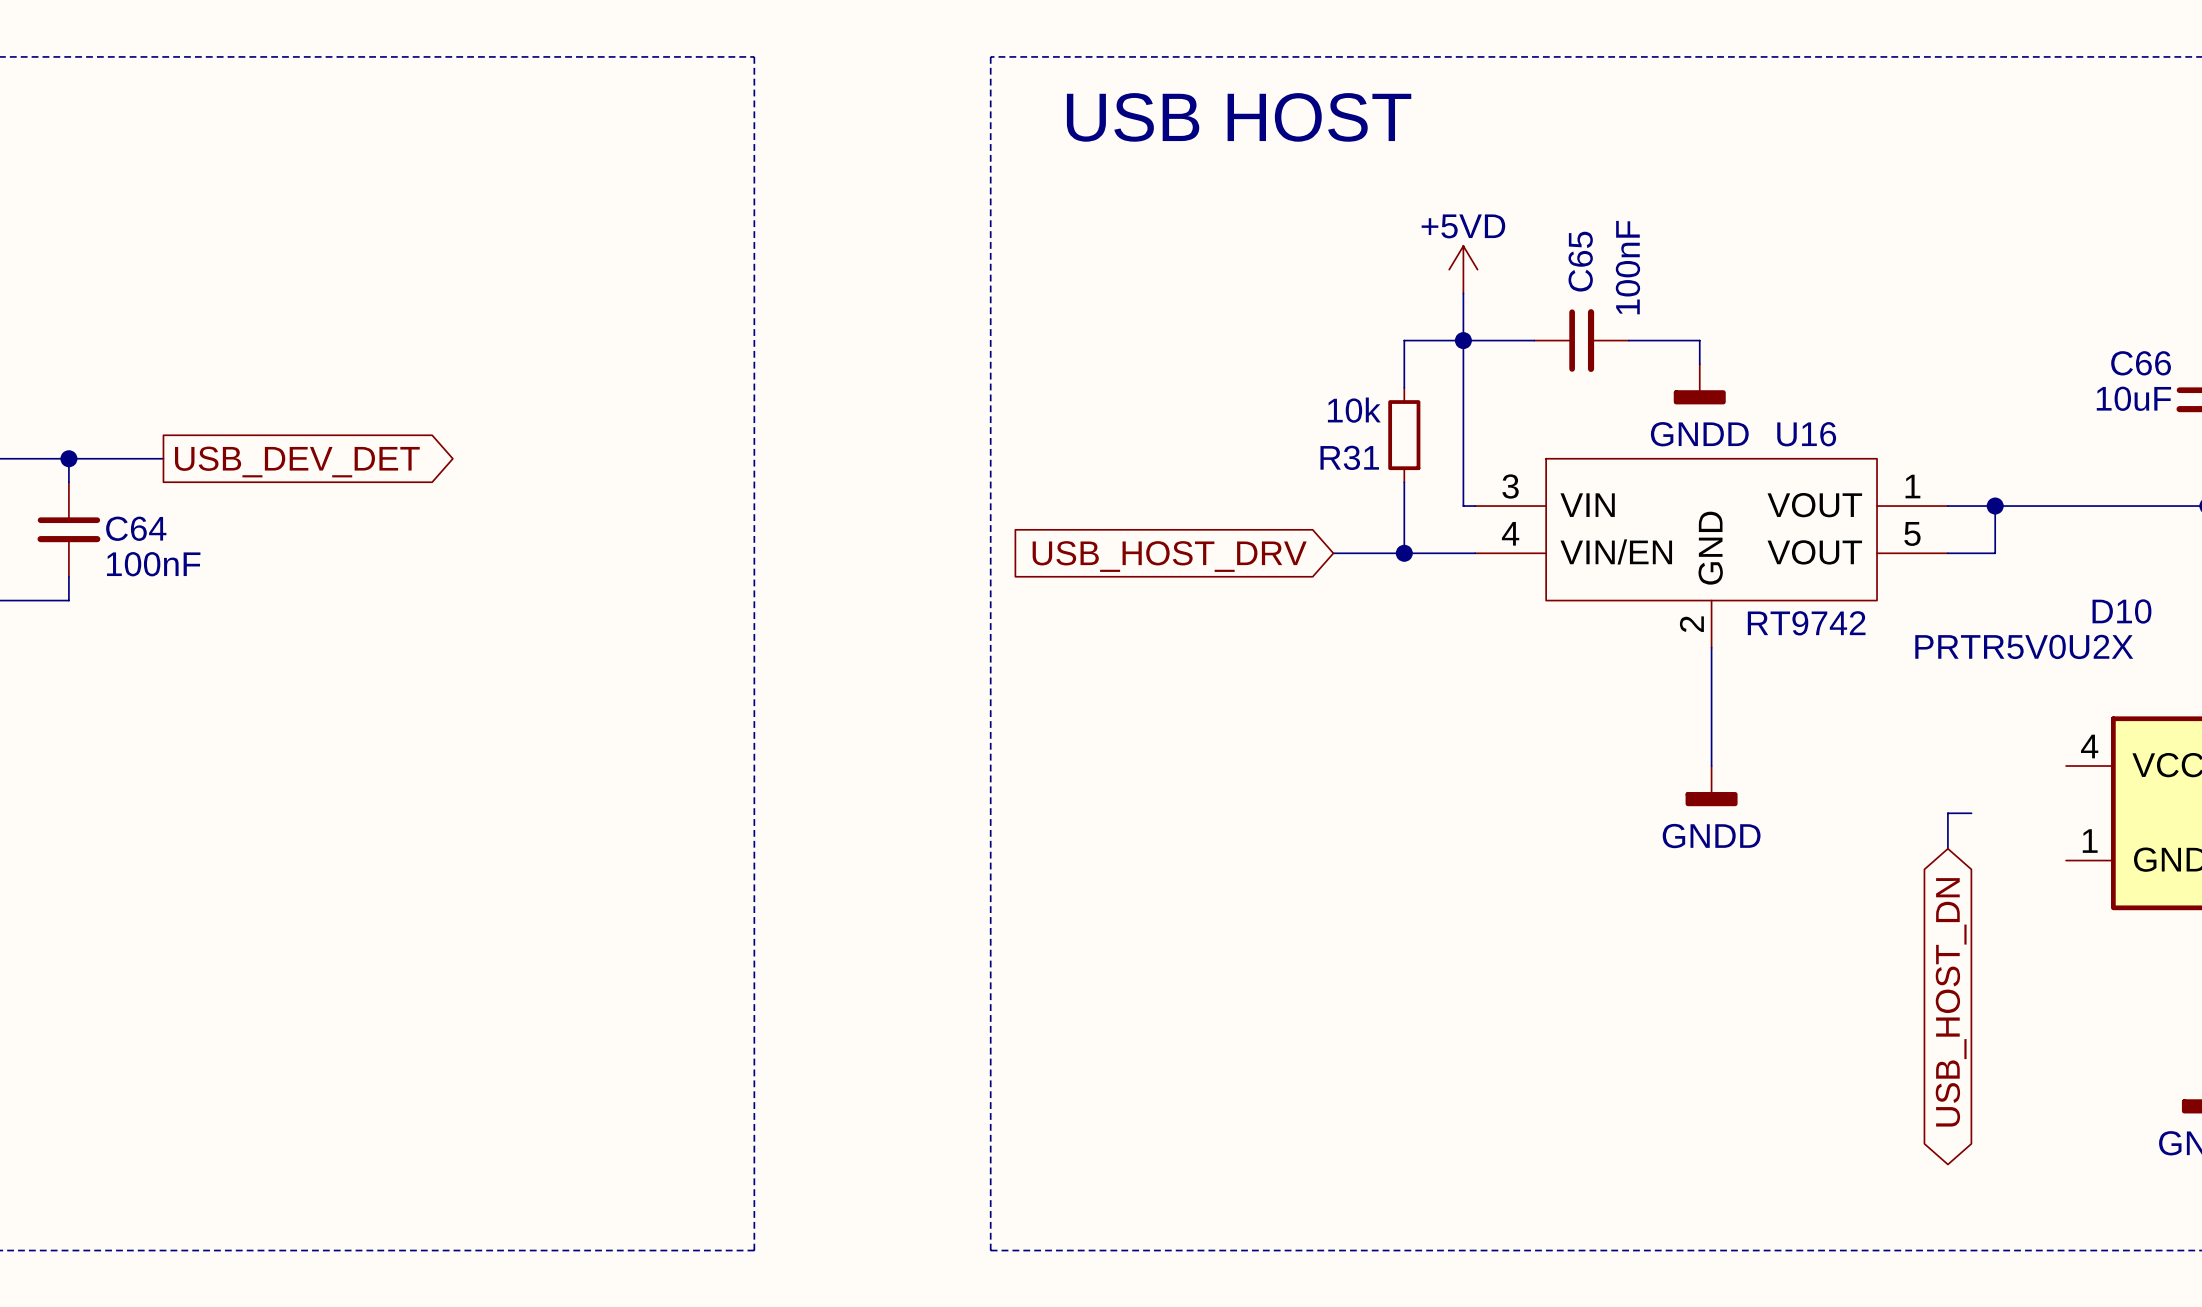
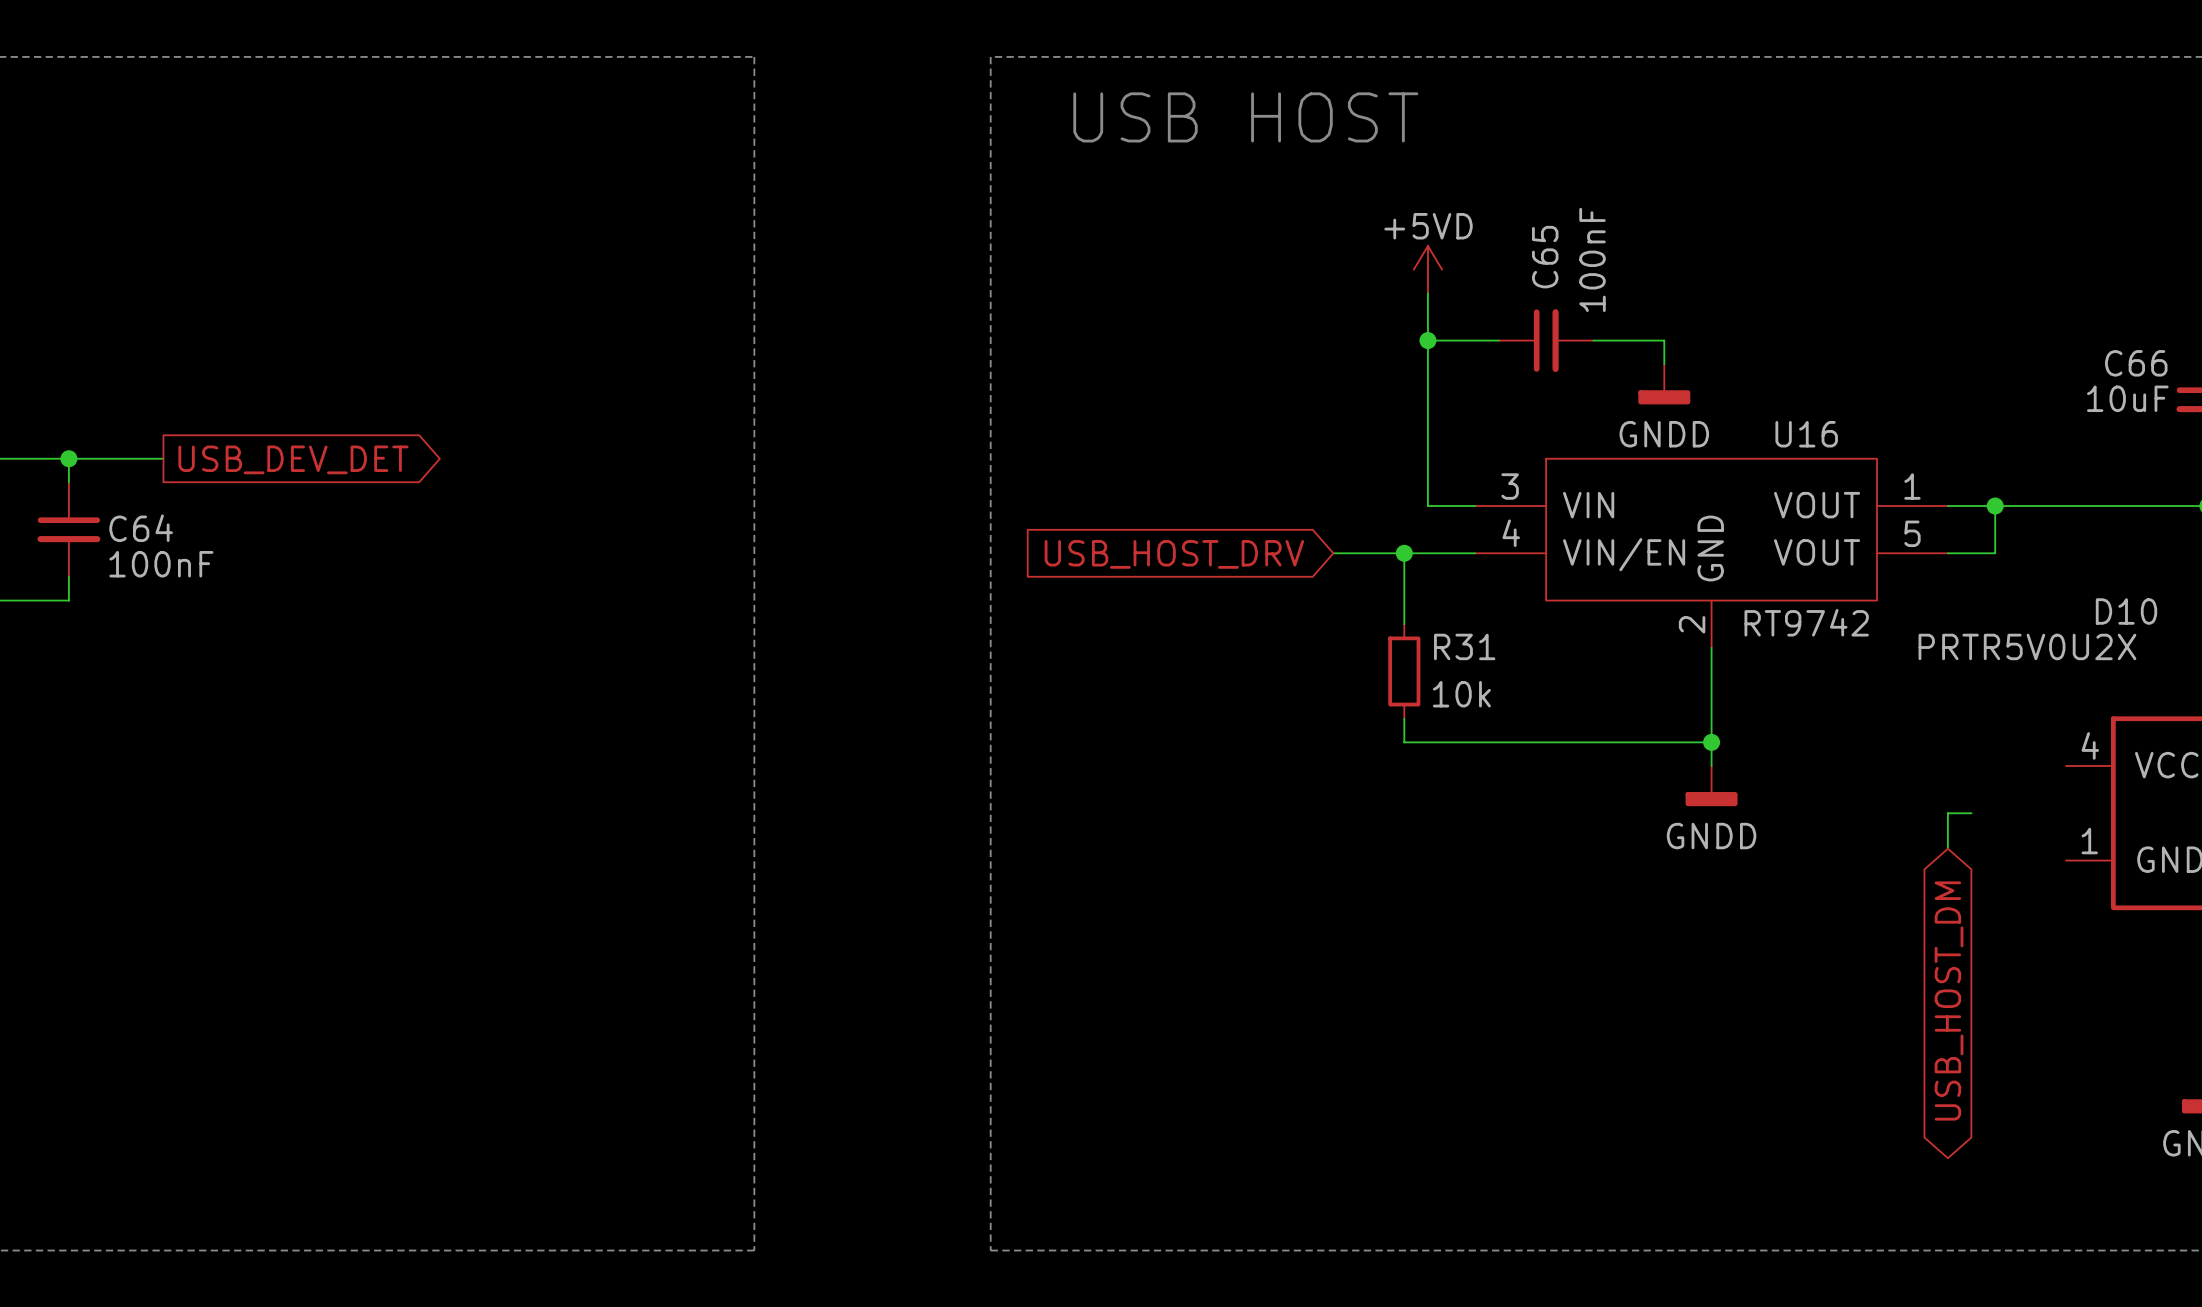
power symbol position: +5VD (1463, 269) -> +5VD (1427, 269)
wire: (1463, 293) (1463, 506) -> (1427, 293) (1427, 506) (1463, 506)
wire: (1427, 340) (1404, 340) (1404, 387) -> none
junction position: (1463, 340) -> (1427, 340)
C65 position: (1581, 340) -> (1546, 340)
wire: (1664, 340) (1699, 340) (1699, 364) -> (1664, 340) (1664, 364)
power symbol position: GNDD (1699, 384) -> GNDD (1664, 384)
R31 value position: 10k (1354, 410) -> 10k (1461, 694)
R31 position: (1404, 435) -> (1404, 671)
R31 name position: R31 (1349, 457) -> R31 (1464, 646)
wire: (1404, 482) (1404, 553) -> (1404, 624) (1404, 553)
wire: none -> (1404, 718) (1404, 742) (1711, 742)
junction: none -> (1711, 742)
global label: USB_HOST_DN (1951, 1002) -> USB_HOST_DM (1949, 1000)

